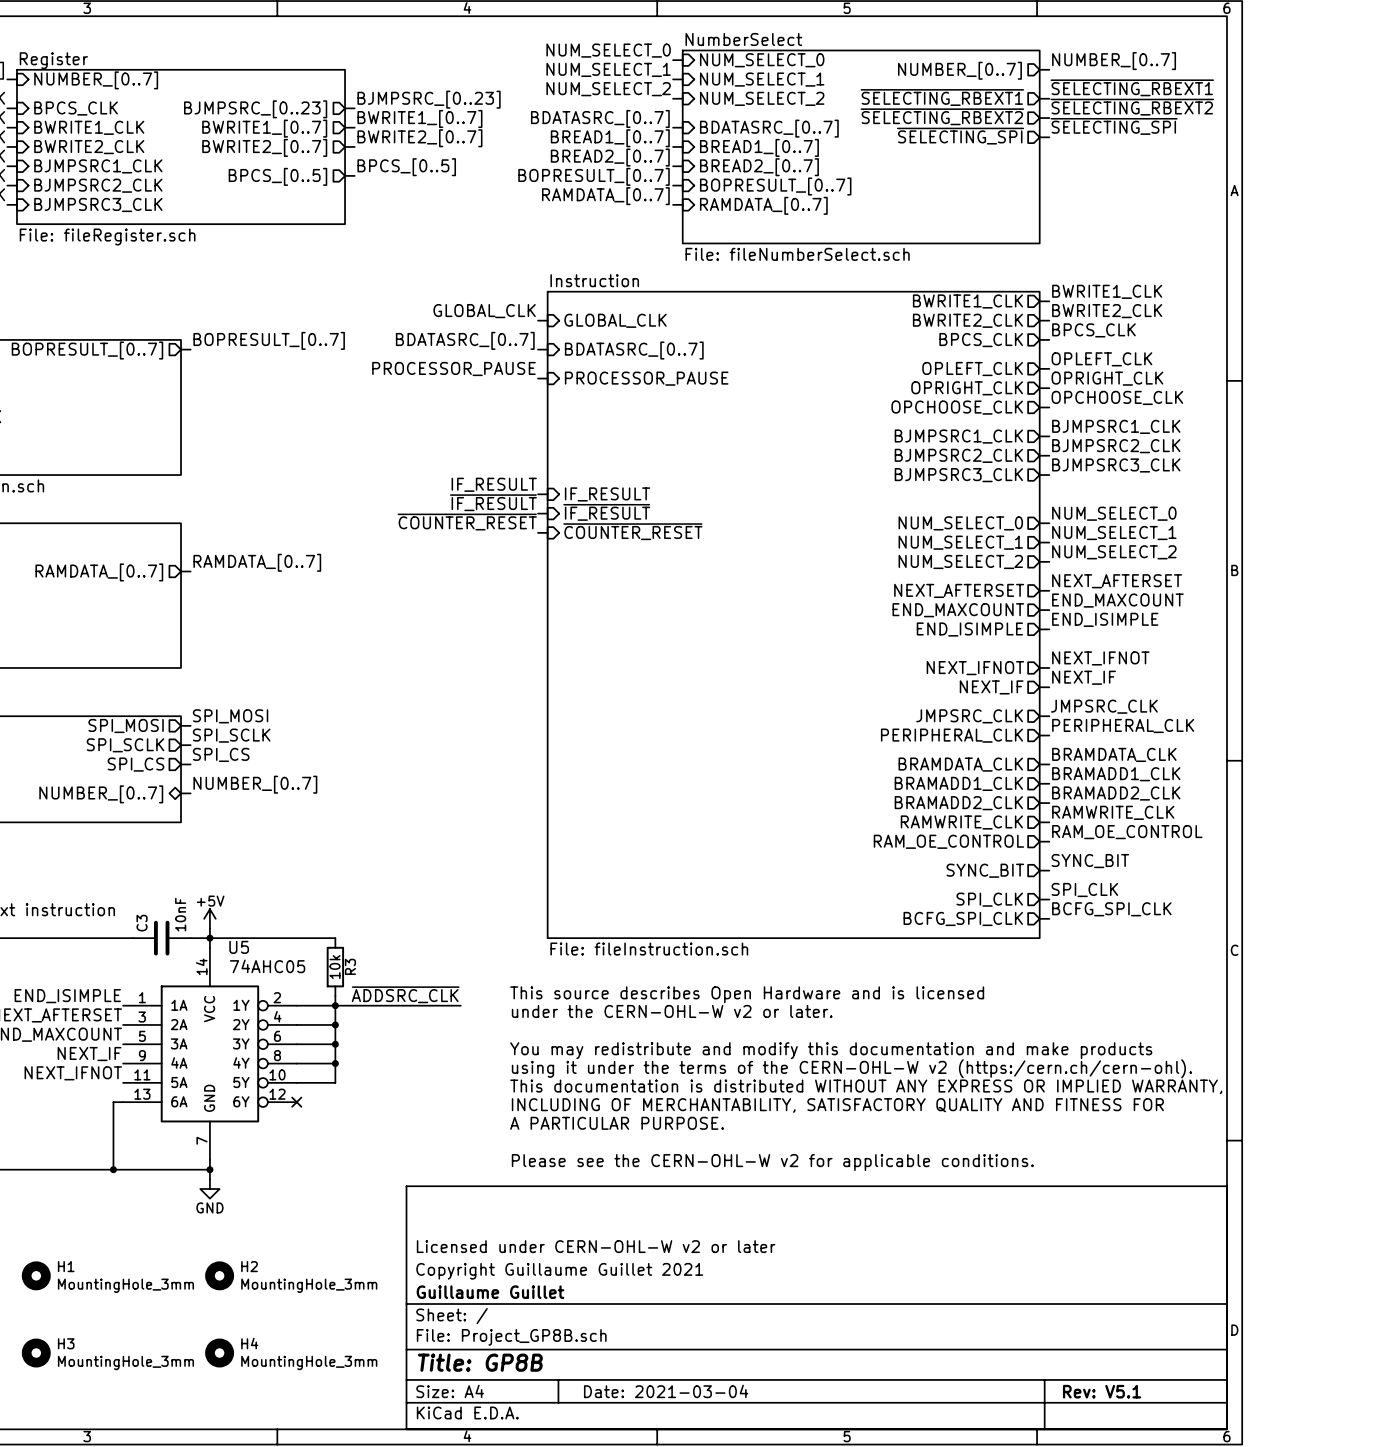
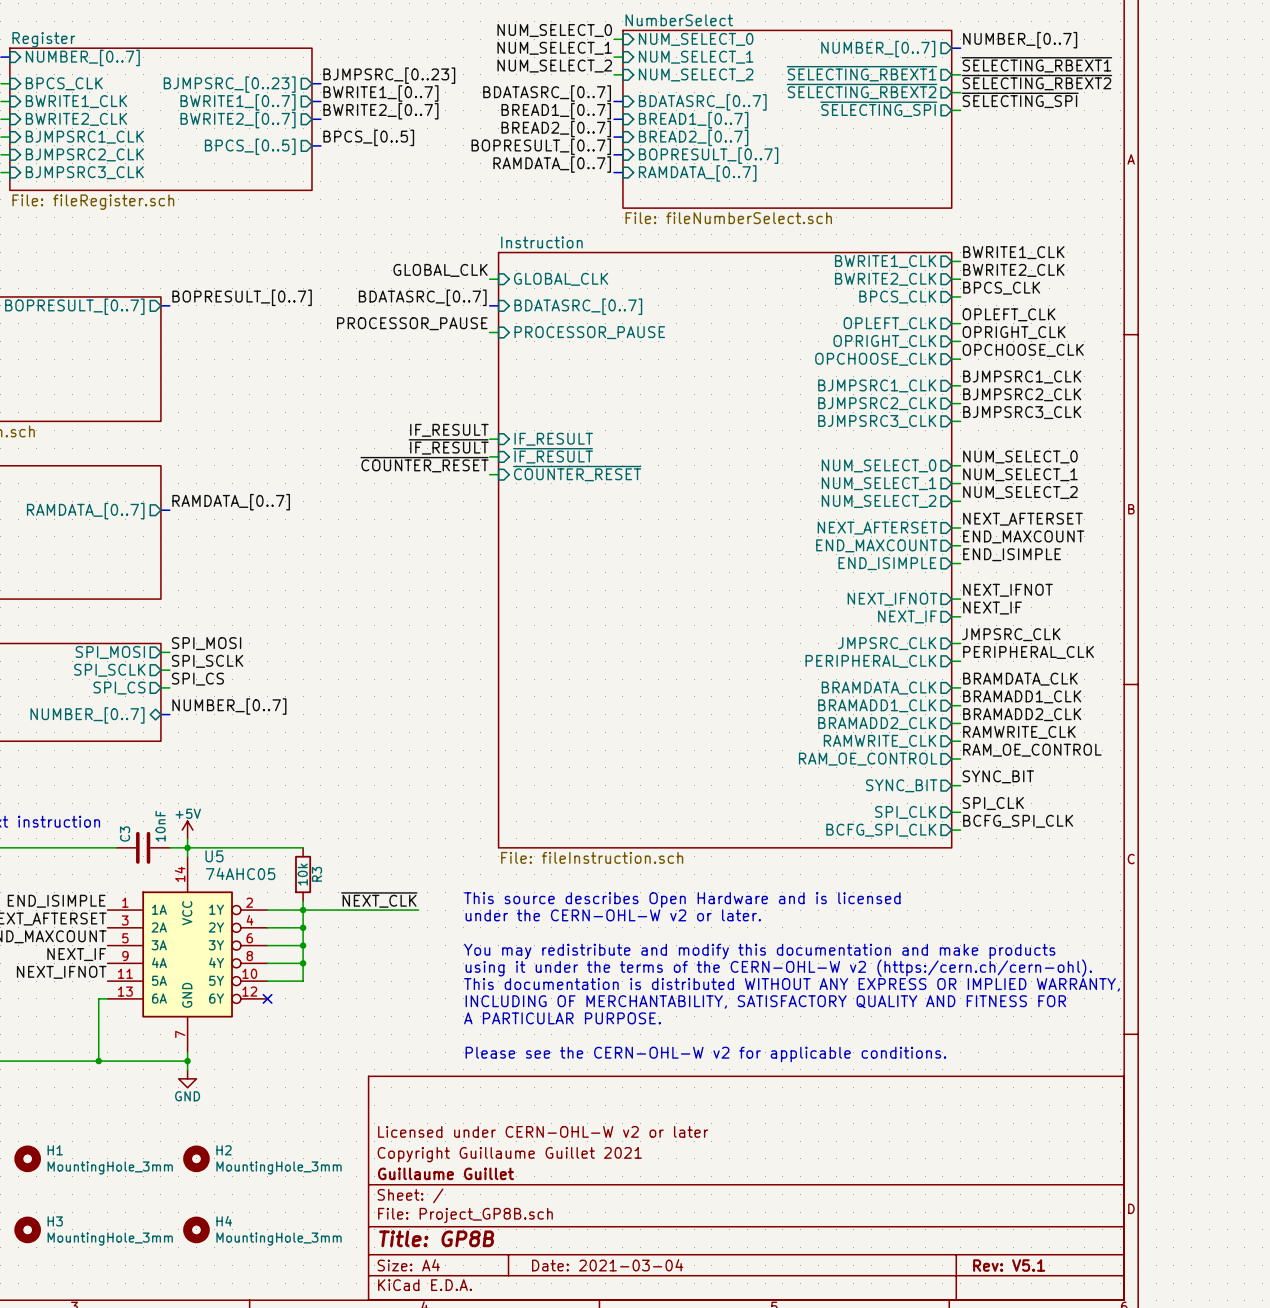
label: ~{ADDSRC_CLK} (405, 994) -> ~{NEXT_CLK} (379, 900)

